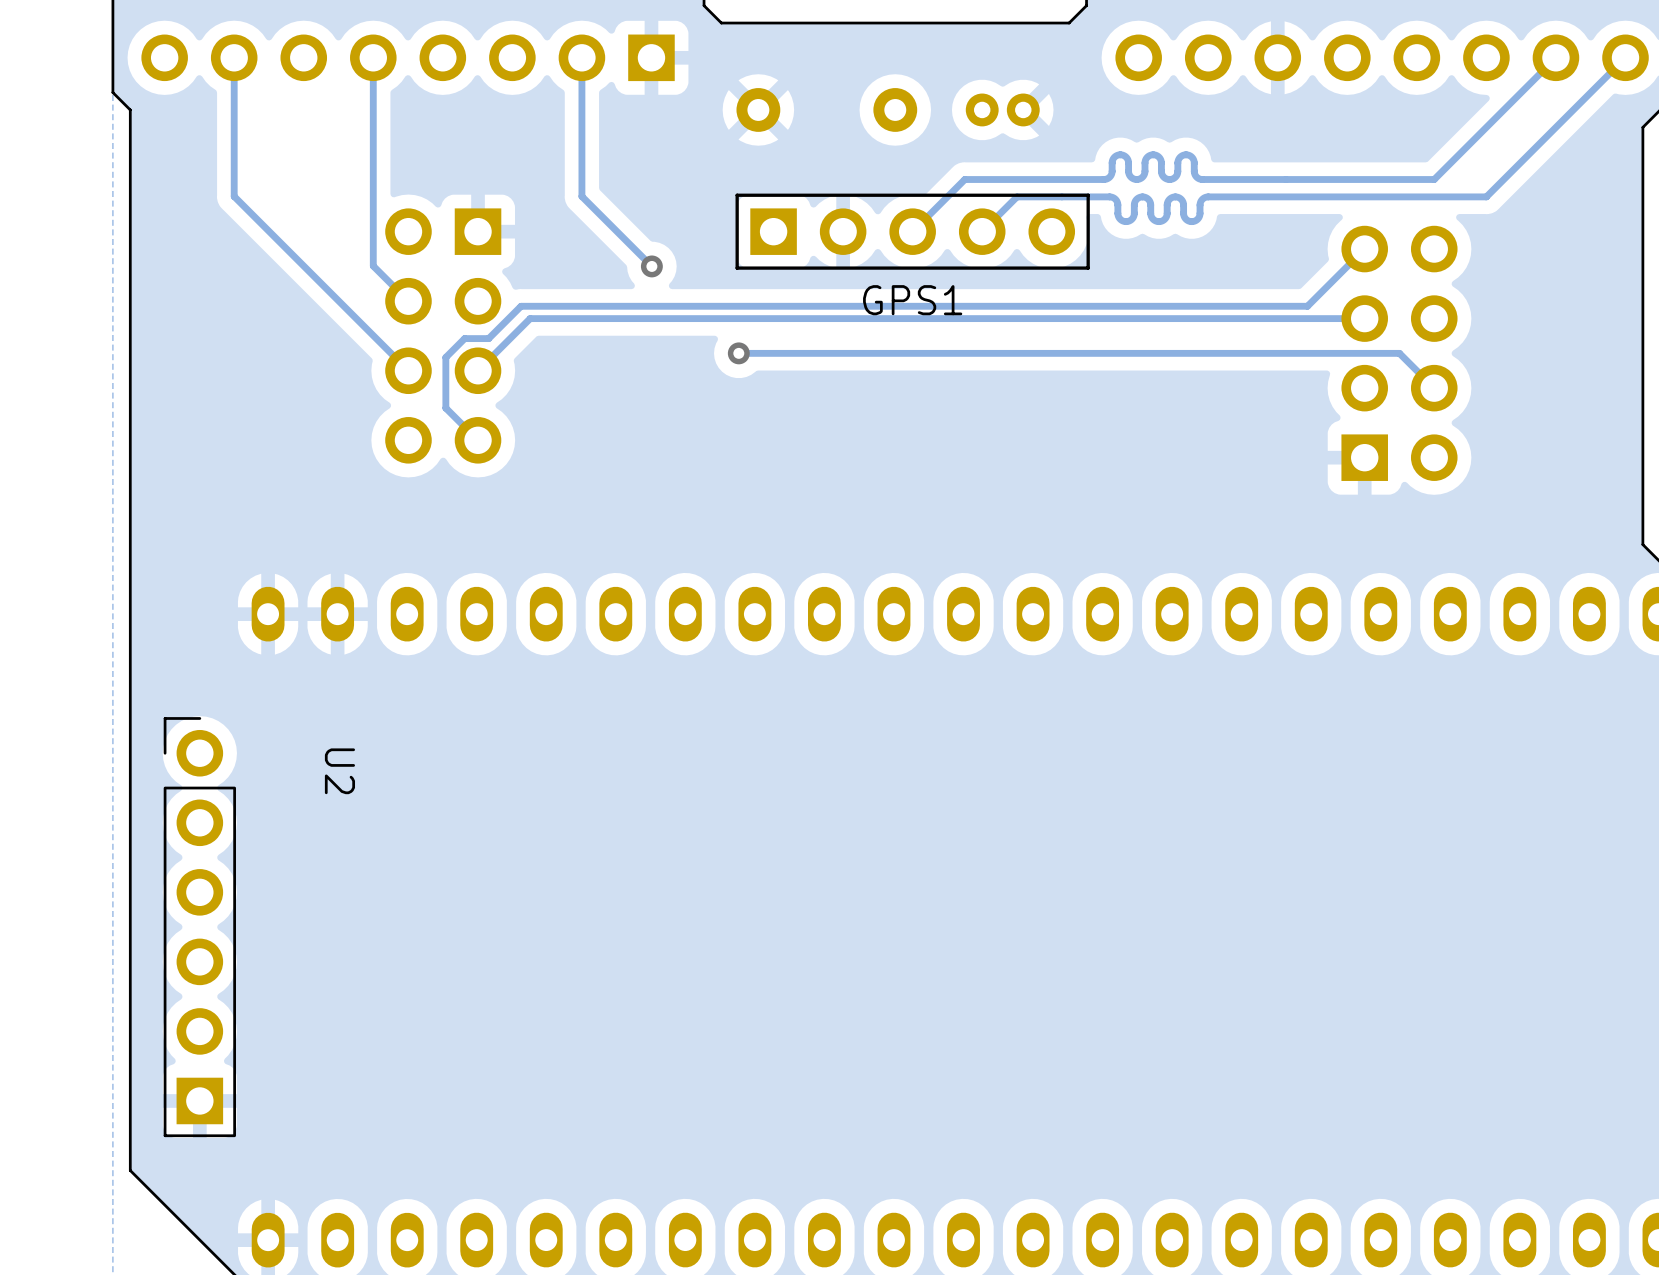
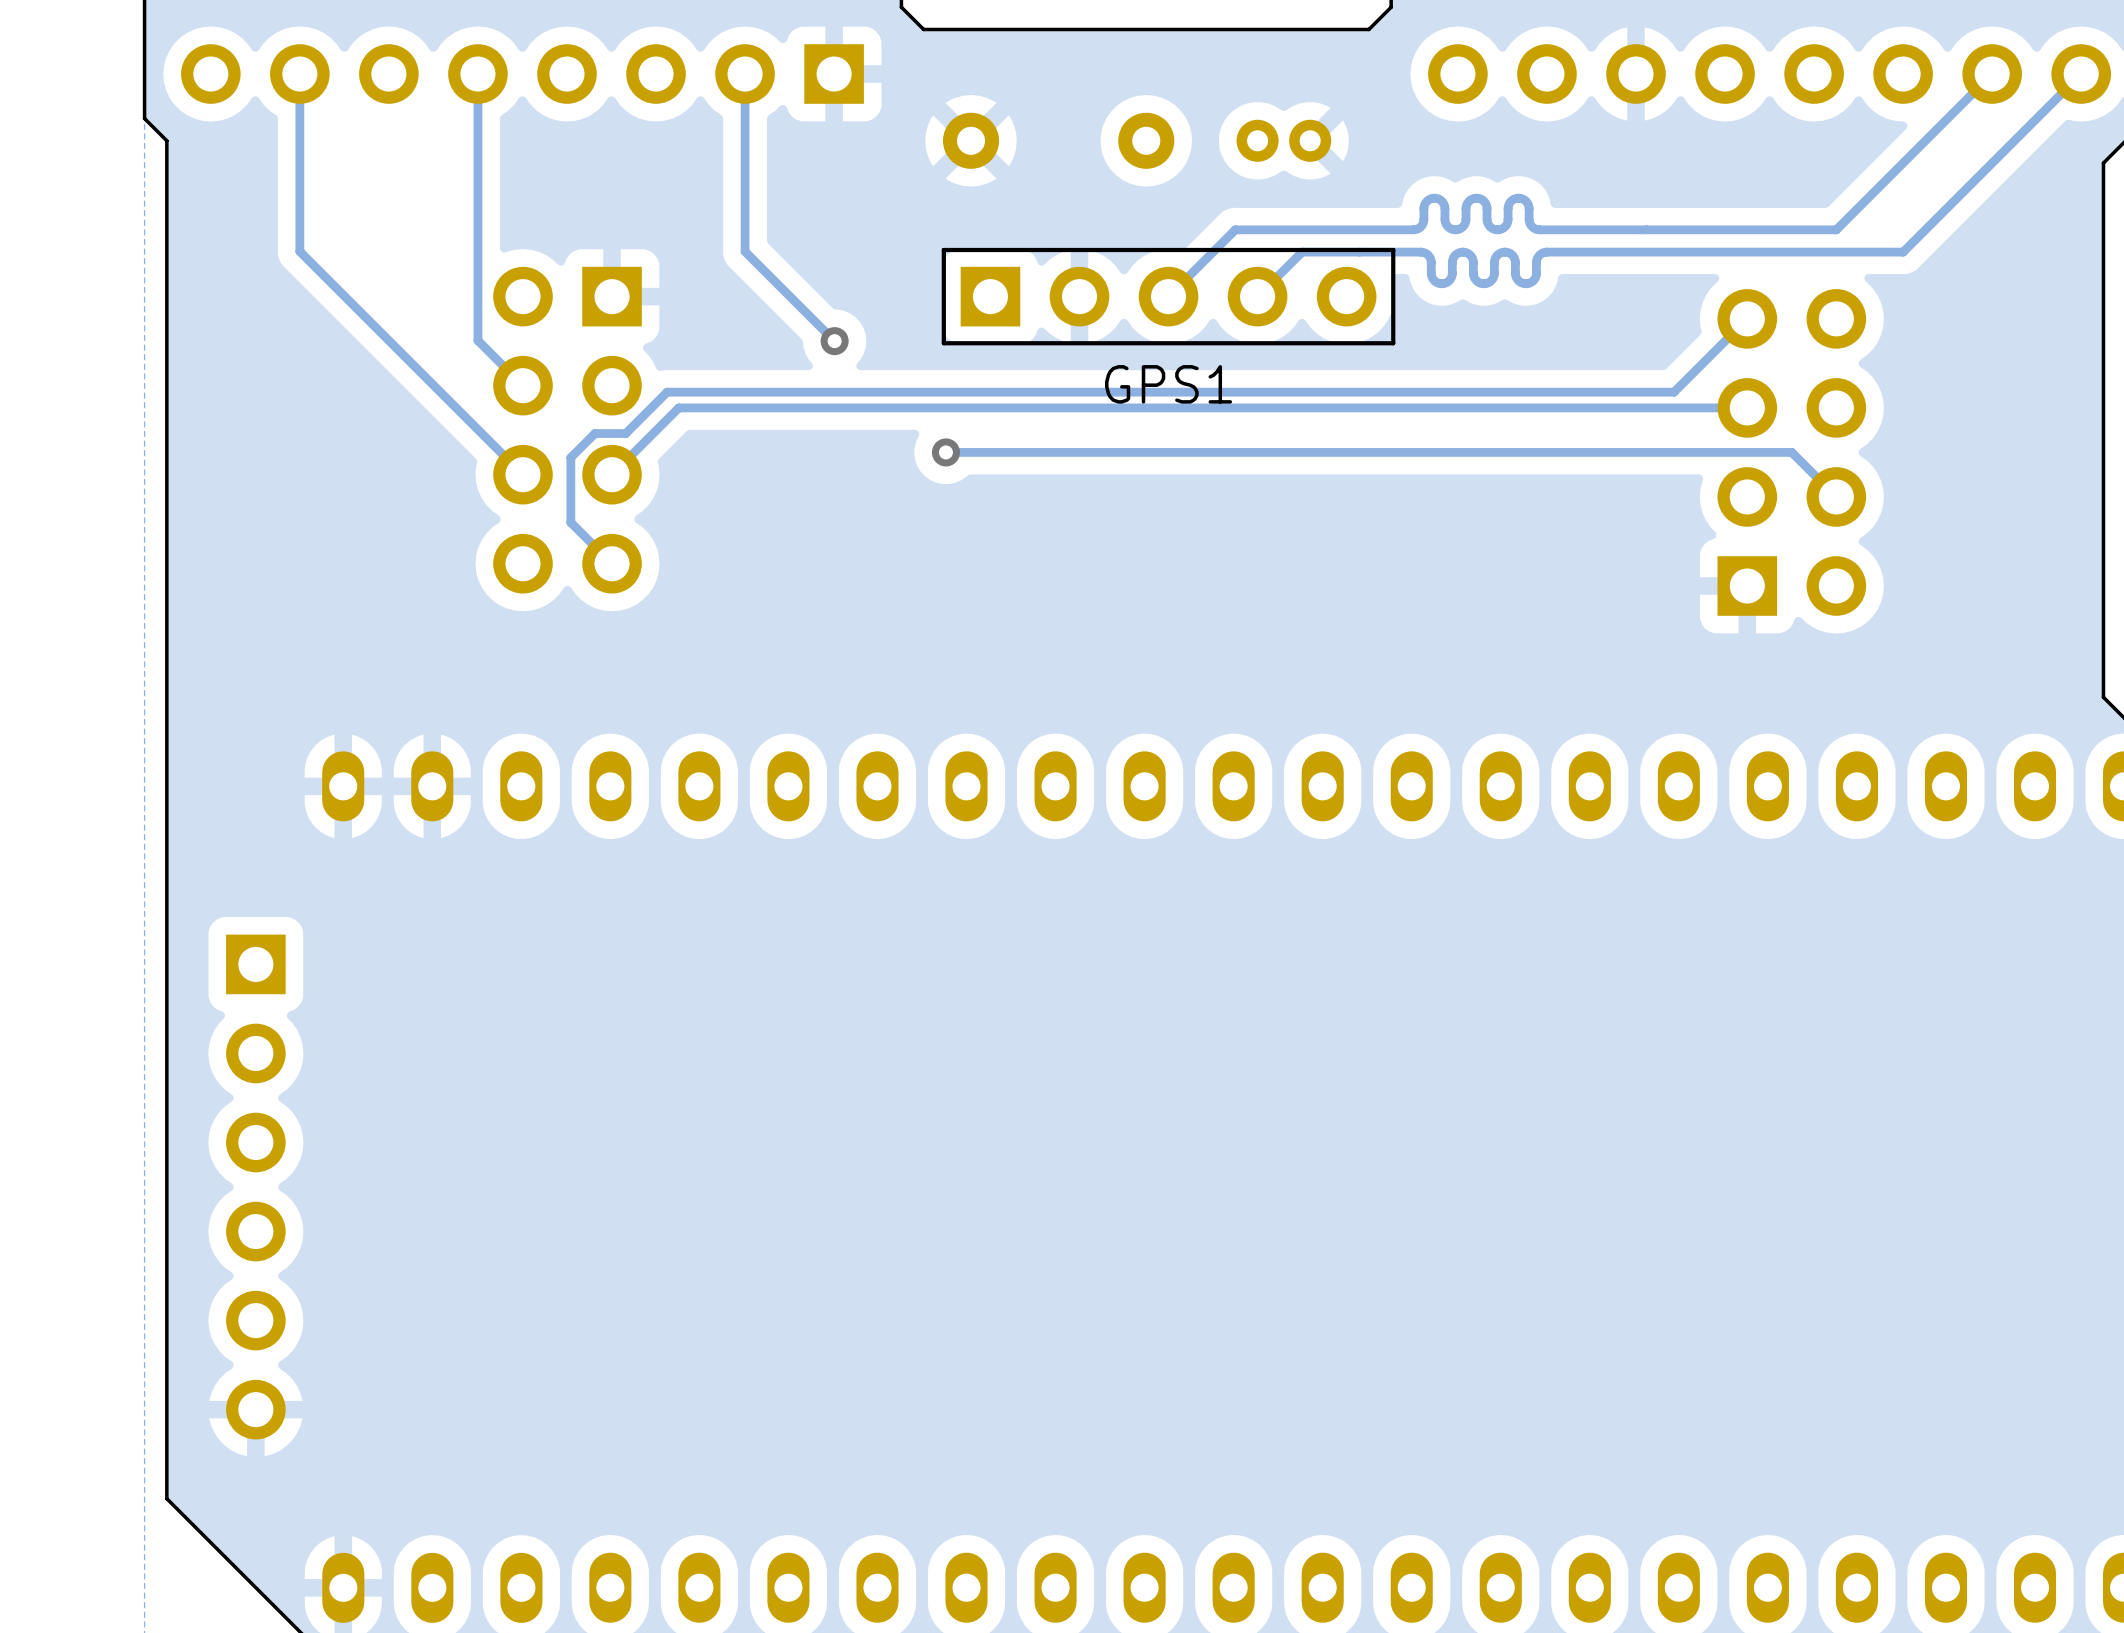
U2: (199, 927) -> none
part: none -> (255, 1187)

